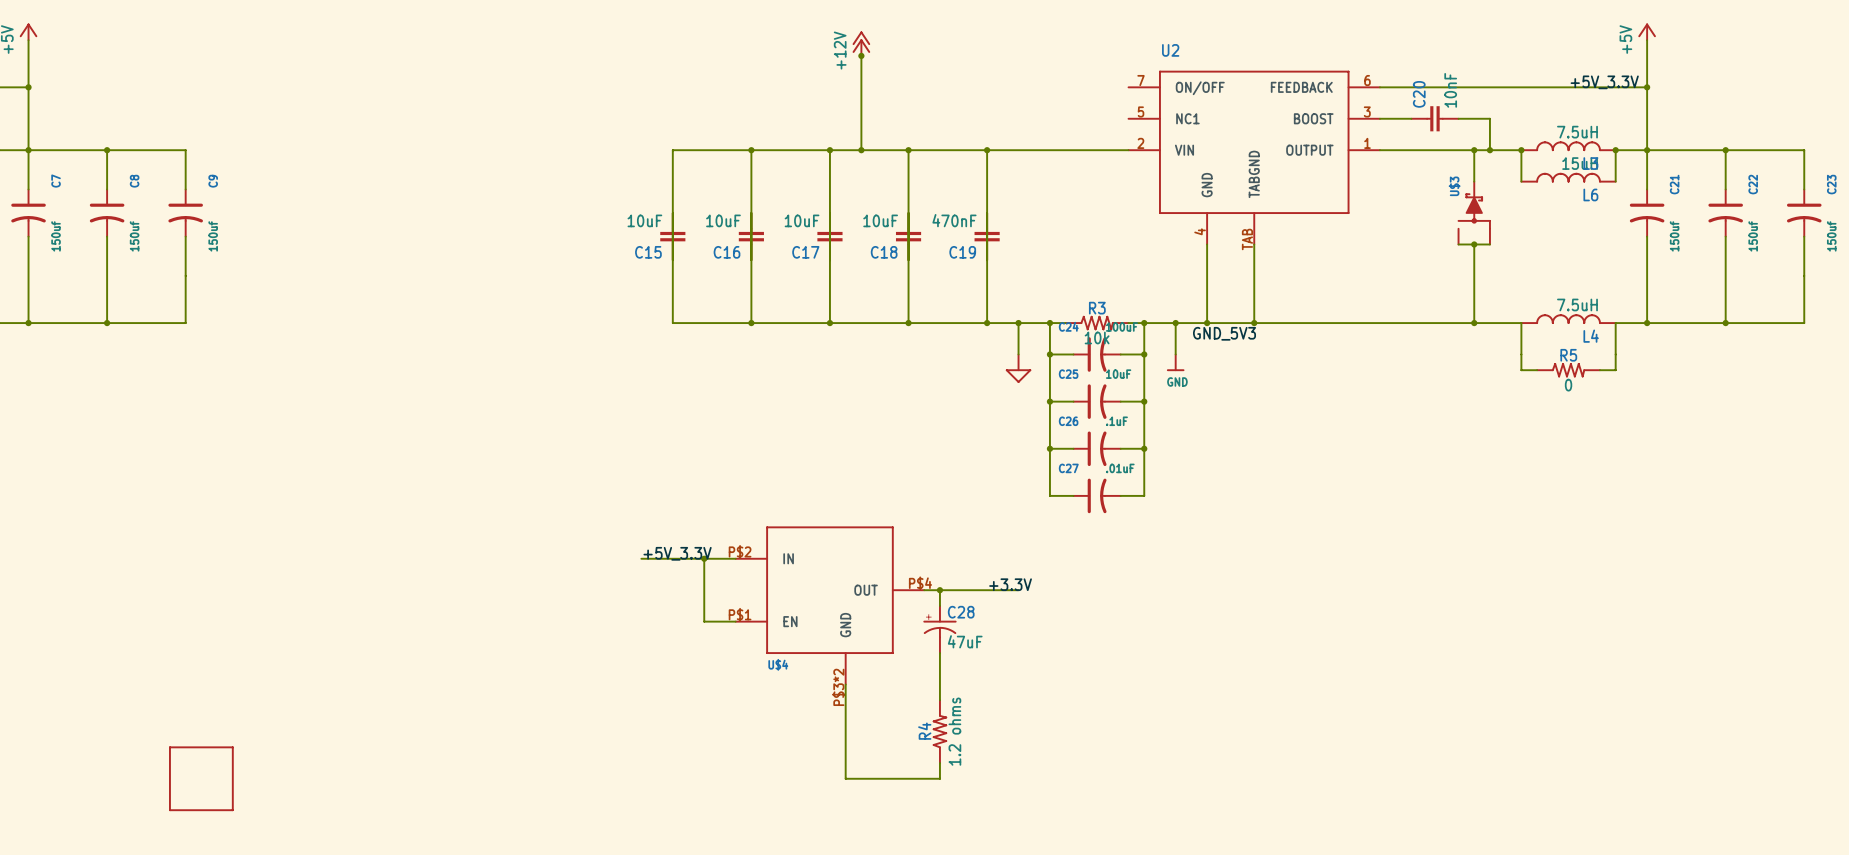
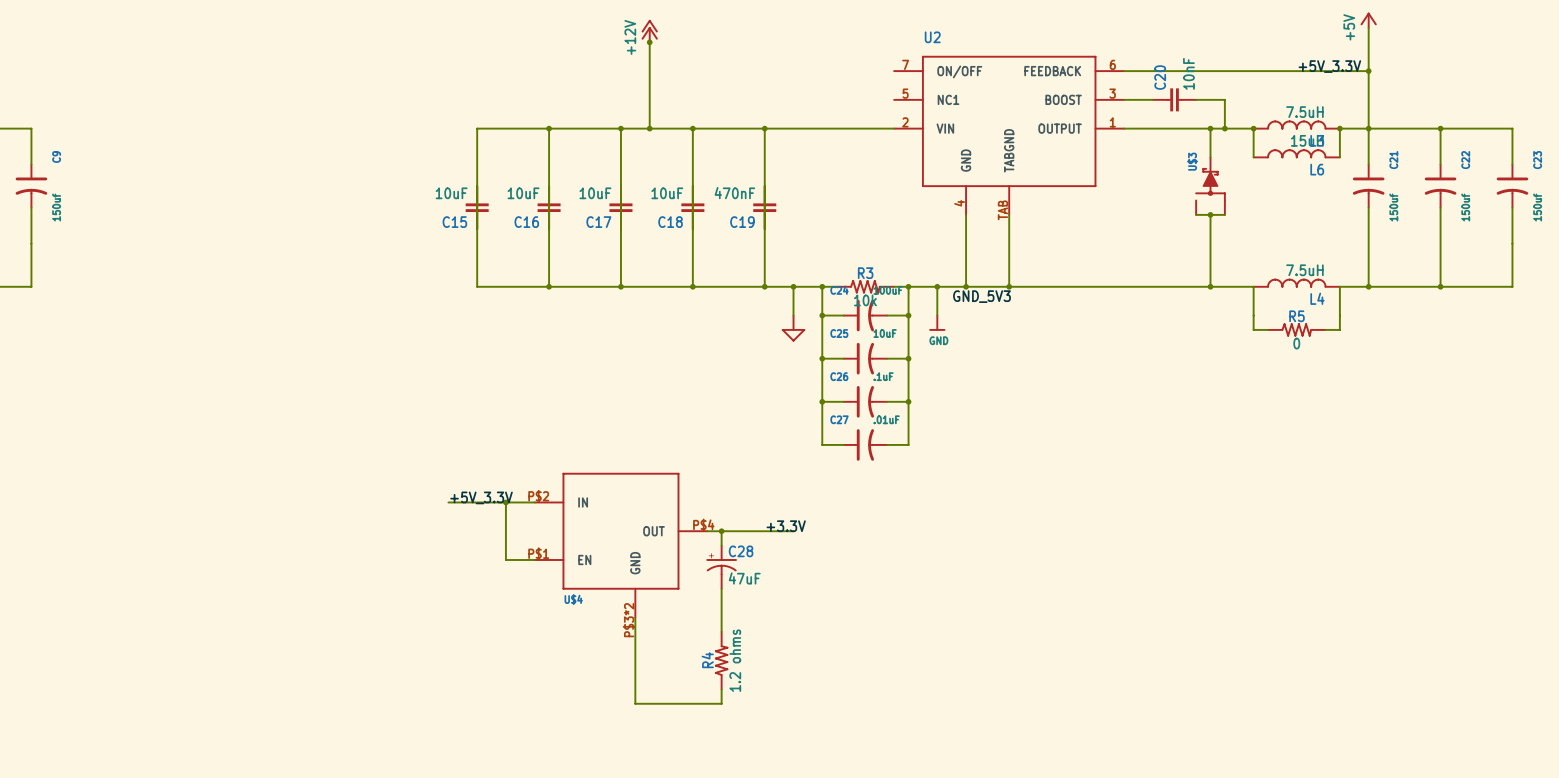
part: (201, 778) -> none

